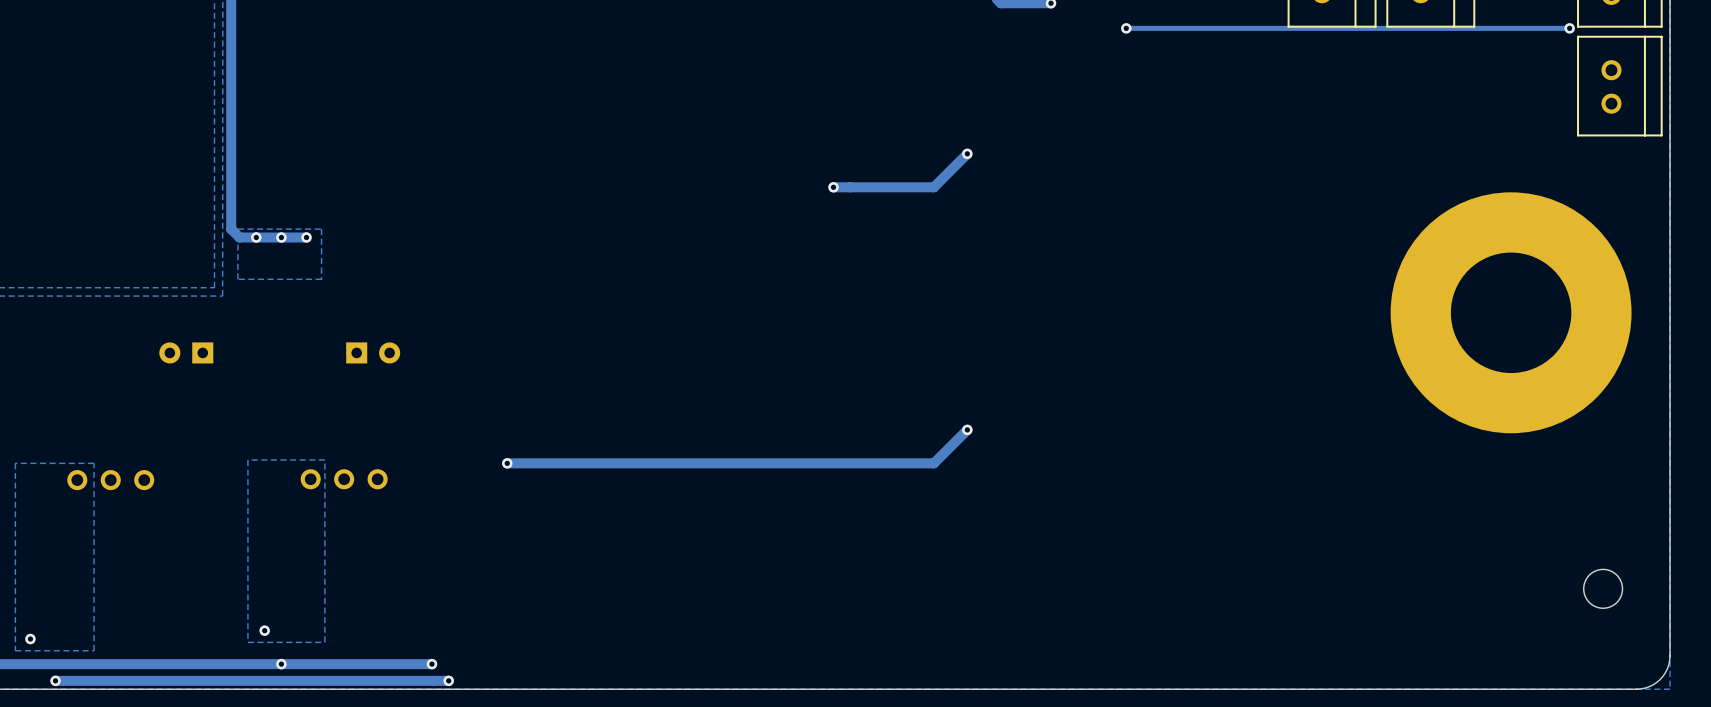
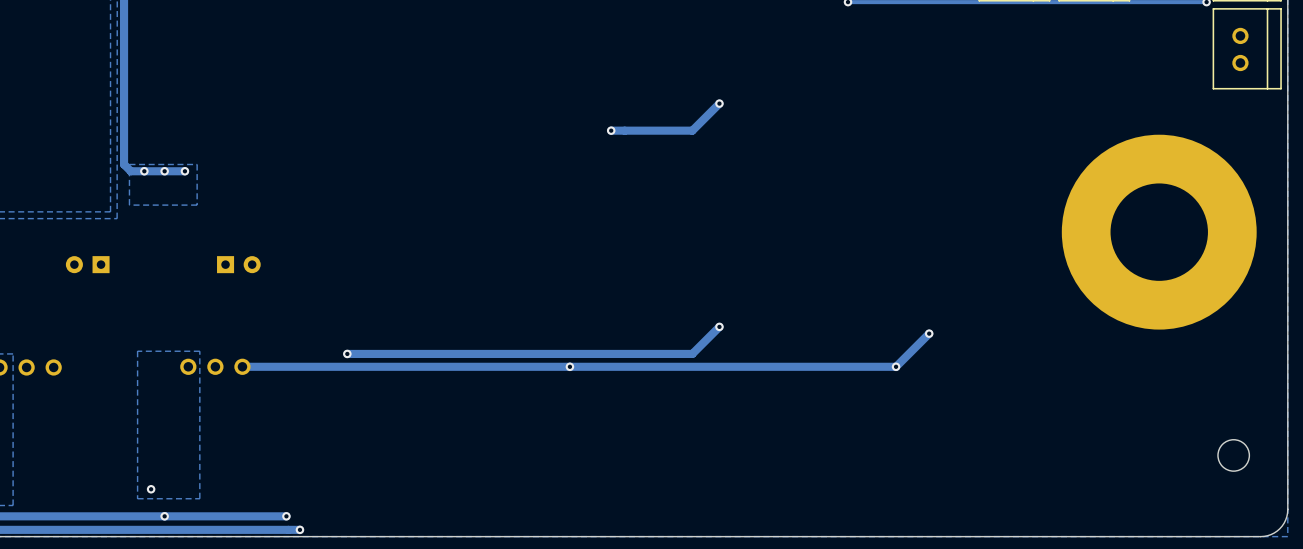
track: none -> (929, 333) (896, 366) (245, 366)
via: none -> (929, 333)
via: none -> (569, 366)
via: none -> (896, 366)

